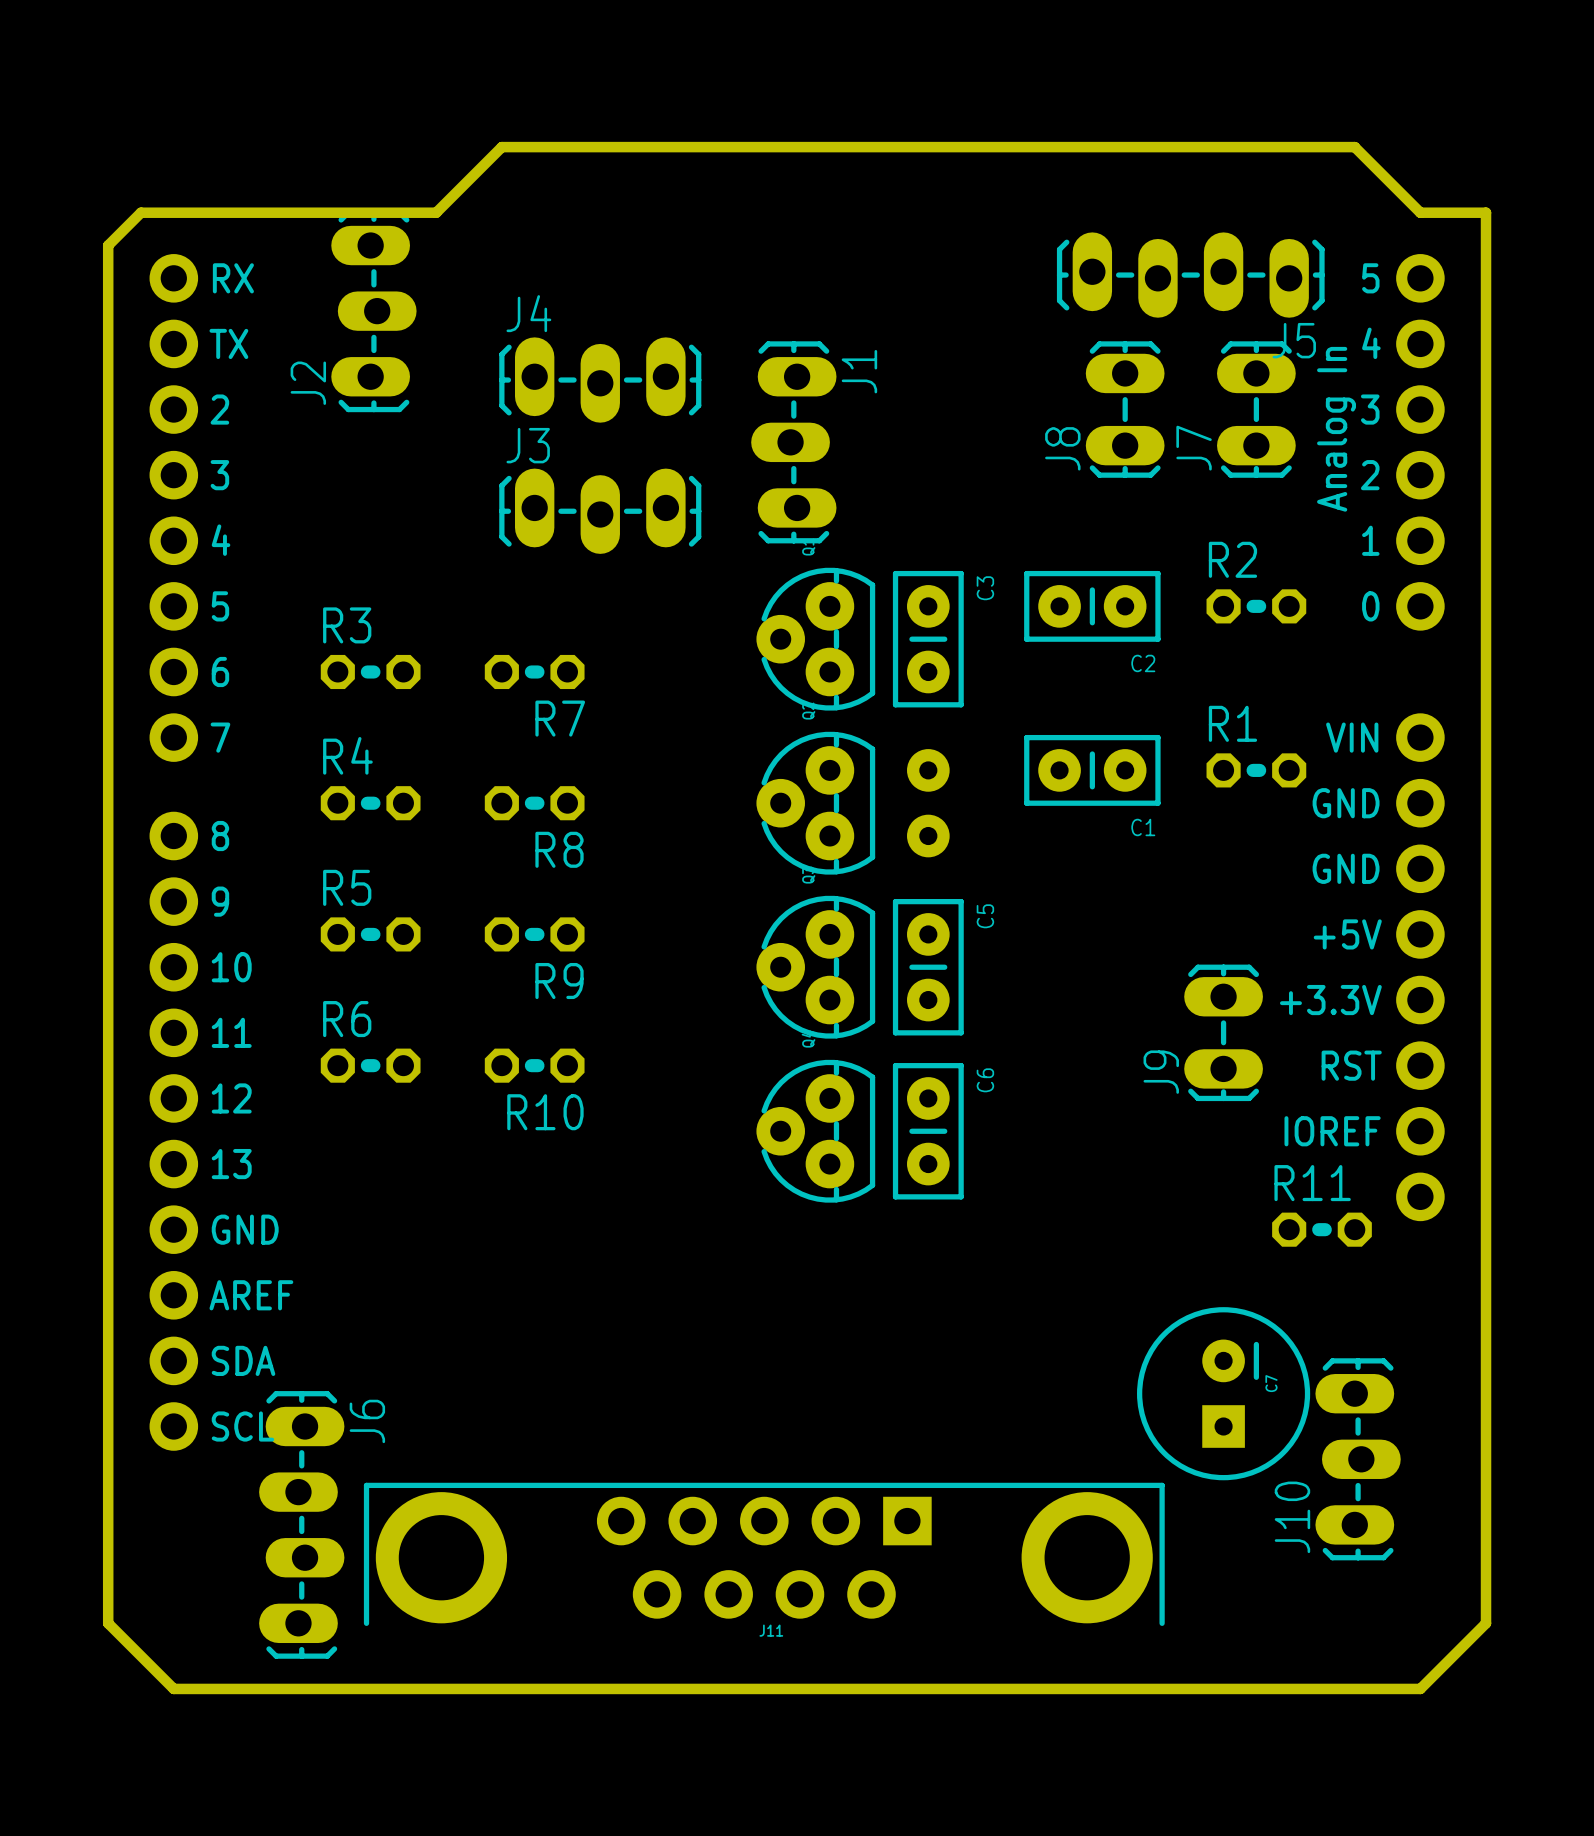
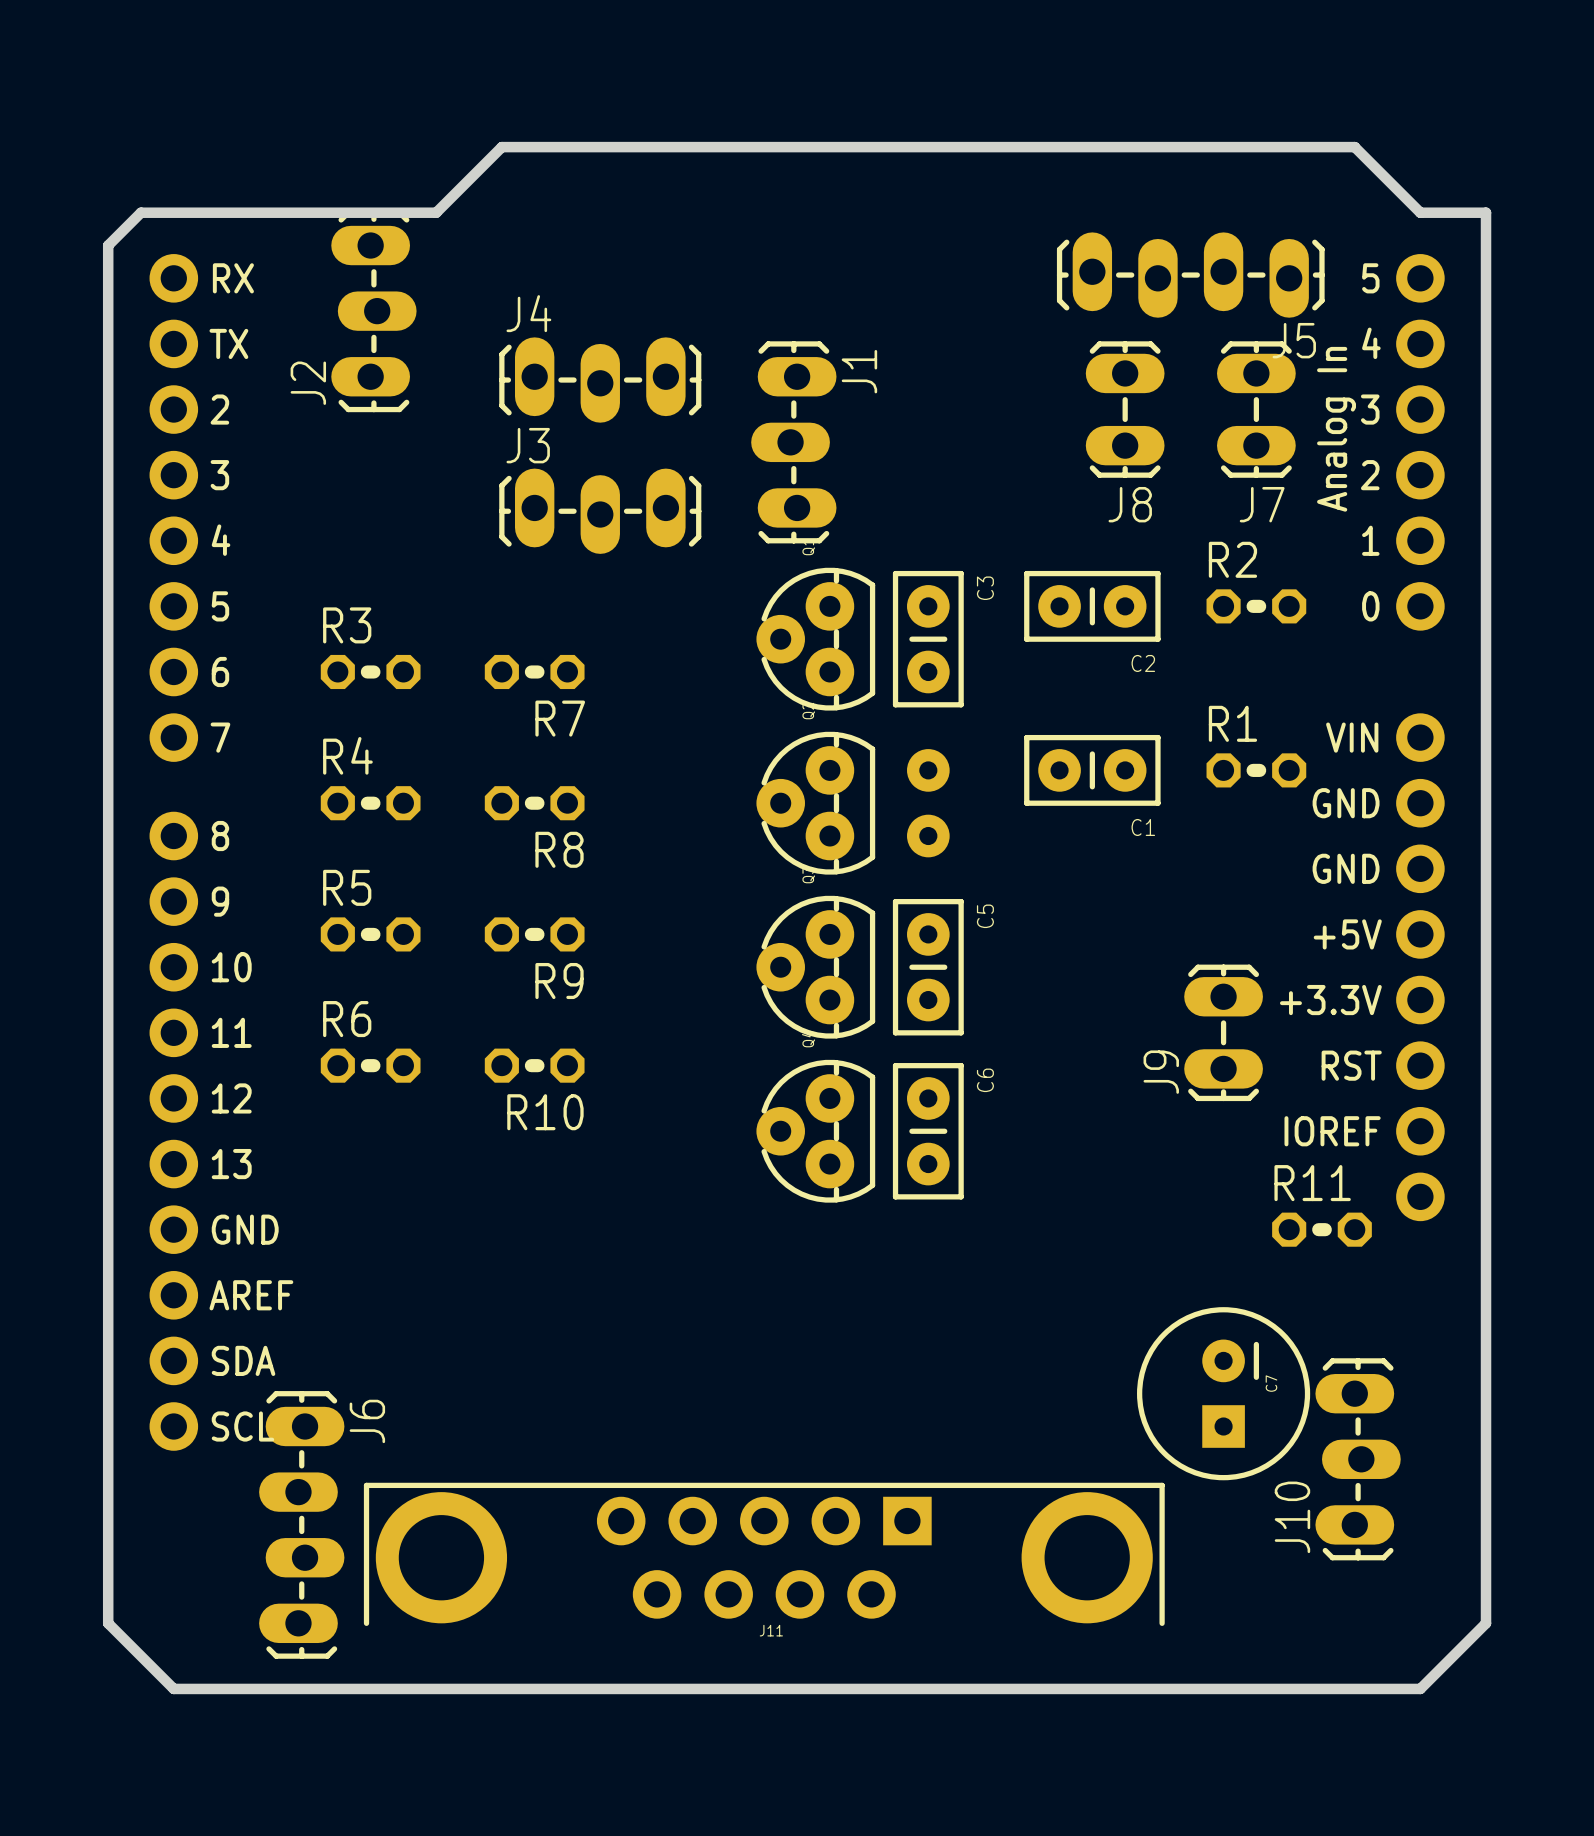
J8 name rotation: 0° (1062, 448) -> 90° clockwise (1130, 504)
J8 name position: J8 (1062, 448) -> J8 (1130, 504)
J7 name rotation: 0° (1194, 448) -> 90° clockwise (1262, 504)
J7 name position: J7 (1194, 448) -> J7 (1262, 504)

